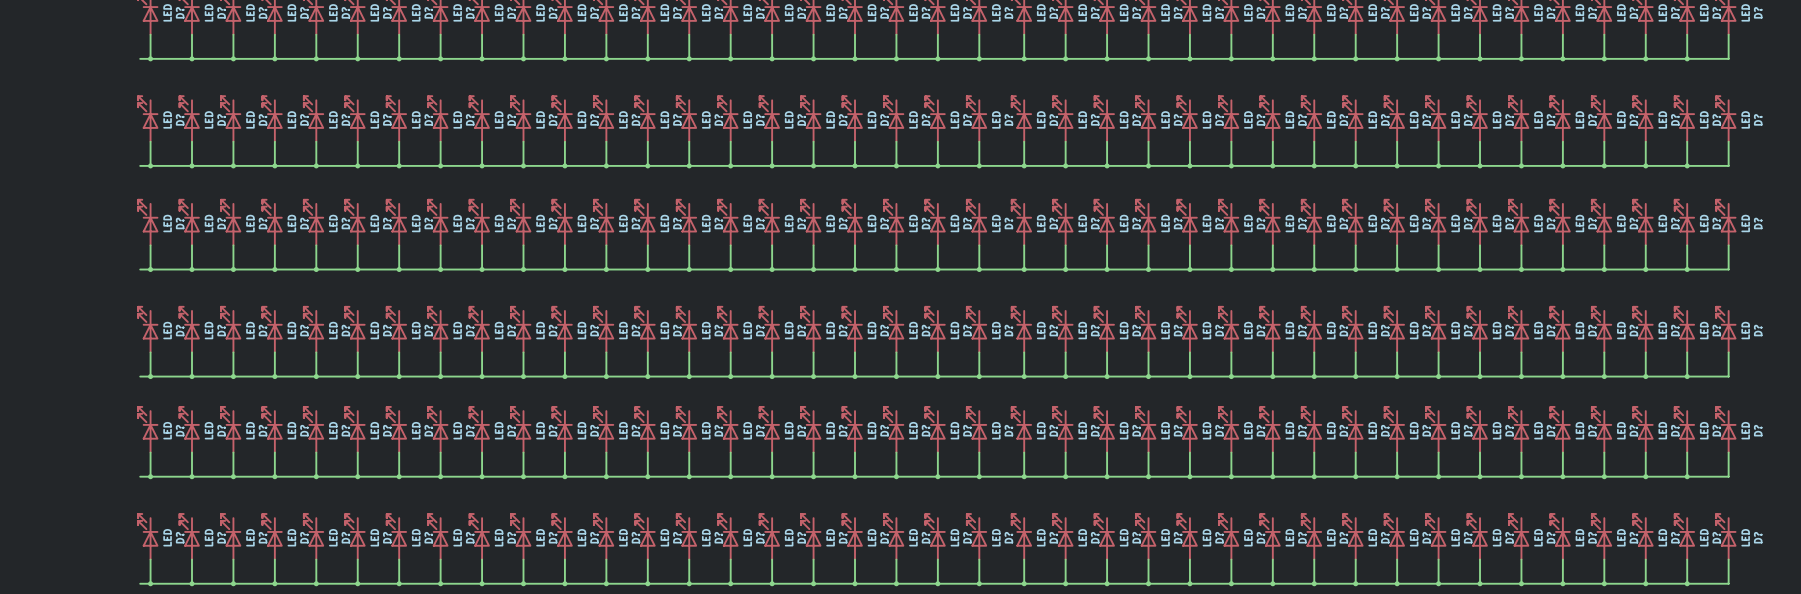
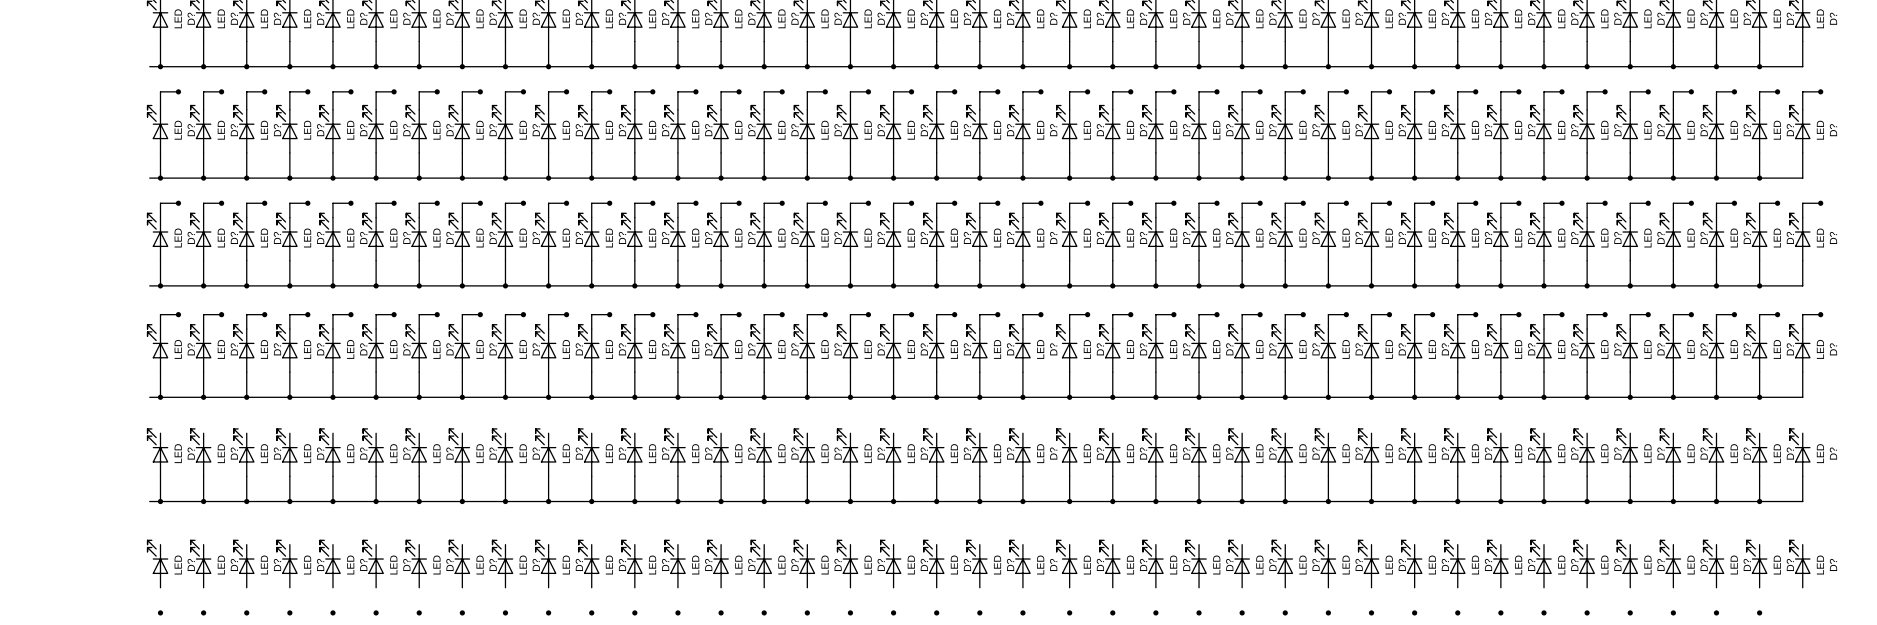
wire: none -> (178, 91) (160, 91) (160, 109)
junction: none -> (178, 91)
wire: none -> (221, 91) (203, 91) (203, 109)
junction: none -> (221, 91)
wire: none -> (264, 91) (246, 91) (246, 109)
junction: none -> (264, 91)
wire: none -> (307, 91) (289, 91) (289, 109)
junction: none -> (307, 91)
wire: none -> (350, 91) (332, 91) (332, 109)
junction: none -> (350, 91)
wire: none -> (394, 91) (376, 91) (376, 109)
junction: none -> (394, 91)
wire: none -> (437, 91) (419, 91) (419, 109)
junction: none -> (437, 91)
wire: none -> (480, 91) (462, 91) (462, 109)
junction: none -> (480, 91)
wire: none -> (523, 91) (505, 91) (505, 109)
junction: none -> (523, 91)
wire: none -> (566, 91) (548, 91) (548, 109)
junction: none -> (566, 91)
wire: none -> (609, 91) (591, 91) (591, 109)
junction: none -> (609, 91)
wire: none -> (652, 91) (634, 91) (634, 109)
junction: none -> (652, 91)
wire: none -> (695, 91) (677, 91) (677, 109)
junction: none -> (695, 91)
wire: none -> (739, 91) (721, 91) (721, 109)
junction: none -> (739, 91)
wire: none -> (782, 91) (764, 91) (764, 109)
junction: none -> (782, 91)
wire: none -> (825, 91) (807, 91) (807, 109)
junction: none -> (825, 91)
wire: none -> (868, 91) (850, 91) (850, 109)
junction: none -> (868, 91)
wire: none -> (911, 91) (893, 91) (893, 109)
junction: none -> (911, 91)
wire: none -> (954, 91) (936, 91) (936, 109)
junction: none -> (954, 91)
wire: none -> (997, 91) (979, 91) (979, 109)
junction: none -> (997, 91)
wire: none -> (1040, 91) (1022, 91) (1022, 109)
junction: none -> (1040, 91)
wire: none -> (1087, 91) (1069, 91) (1069, 109)
junction: none -> (1087, 91)
wire: none -> (1130, 91) (1112, 91) (1112, 109)
junction: none -> (1130, 91)
wire: none -> (1173, 91) (1155, 91) (1155, 109)
junction: none -> (1173, 91)
wire: none -> (1216, 91) (1199, 91) (1199, 109)
junction: none -> (1216, 91)
wire: none -> (1260, 91) (1242, 91) (1242, 109)
junction: none -> (1260, 91)
wire: none -> (1303, 91) (1285, 91) (1285, 109)
junction: none -> (1303, 91)
wire: none -> (1346, 91) (1328, 91) (1328, 109)
junction: none -> (1346, 91)
wire: none -> (1389, 91) (1371, 91) (1371, 109)
junction: none -> (1389, 91)
wire: none -> (1432, 91) (1414, 91) (1414, 109)
junction: none -> (1432, 91)
wire: none -> (1475, 91) (1457, 91) (1457, 109)
junction: none -> (1475, 91)
wire: none -> (1518, 91) (1500, 91) (1500, 109)
junction: none -> (1518, 91)
wire: none -> (1561, 91) (1544, 91) (1544, 109)
junction: none -> (1561, 91)
wire: none -> (1605, 91) (1587, 91) (1587, 109)
junction: none -> (1605, 91)
wire: none -> (1648, 91) (1630, 91) (1630, 109)
junction: none -> (1648, 91)
wire: none -> (1691, 91) (1673, 91) (1673, 109)
junction: none -> (1691, 91)
wire: none -> (1734, 91) (1716, 91) (1716, 109)
junction: none -> (1734, 91)
wire: none -> (1777, 91) (1759, 91) (1759, 109)
junction: none -> (1777, 91)
wire: none -> (1820, 91) (1802, 91) (1802, 109)
junction: none -> (1820, 91)
wire: none -> (178, 203) (160, 203) (160, 217)
junction: none -> (178, 203)
wire: none -> (221, 203) (203, 203) (203, 217)
junction: none -> (221, 203)
wire: none -> (264, 203) (246, 203) (246, 217)
junction: none -> (264, 203)
wire: none -> (307, 203) (289, 203) (289, 217)
junction: none -> (307, 203)
wire: none -> (350, 203) (332, 203) (332, 217)
junction: none -> (350, 203)
wire: none -> (394, 203) (376, 203) (376, 217)
junction: none -> (394, 203)
wire: none -> (437, 203) (419, 203) (419, 217)
junction: none -> (437, 203)
wire: none -> (480, 203) (462, 203) (462, 217)
junction: none -> (480, 203)
wire: none -> (523, 203) (505, 203) (505, 217)
junction: none -> (523, 203)
wire: none -> (566, 203) (548, 203) (548, 217)
junction: none -> (566, 203)
wire: none -> (609, 203) (591, 203) (591, 217)
junction: none -> (609, 203)
wire: none -> (652, 203) (634, 203) (634, 217)
junction: none -> (652, 203)
wire: none -> (695, 203) (677, 203) (677, 217)
junction: none -> (695, 203)
wire: none -> (739, 203) (721, 203) (721, 217)
junction: none -> (739, 203)
wire: none -> (782, 203) (764, 203) (764, 217)
junction: none -> (782, 203)
wire: none -> (825, 203) (807, 203) (807, 217)
junction: none -> (825, 203)
wire: none -> (868, 203) (850, 203) (850, 217)
junction: none -> (868, 203)
wire: none -> (911, 203) (893, 203) (893, 217)
junction: none -> (911, 203)
wire: none -> (954, 203) (936, 203) (936, 217)
junction: none -> (954, 203)
wire: none -> (997, 203) (979, 203) (979, 217)
junction: none -> (997, 203)
wire: none -> (1040, 203) (1022, 203) (1022, 217)
junction: none -> (1040, 203)
wire: none -> (1087, 203) (1069, 203) (1069, 217)
junction: none -> (1087, 203)
wire: none -> (1130, 203) (1112, 203) (1112, 217)
junction: none -> (1130, 203)
wire: none -> (1173, 203) (1155, 203) (1155, 217)
junction: none -> (1173, 203)
wire: none -> (1216, 203) (1199, 203) (1199, 217)
junction: none -> (1216, 203)
wire: none -> (1260, 203) (1242, 203) (1242, 217)
junction: none -> (1260, 203)
wire: none -> (1303, 203) (1285, 203) (1285, 217)
junction: none -> (1303, 203)
wire: none -> (1346, 203) (1328, 203) (1328, 217)
junction: none -> (1346, 203)
wire: none -> (1389, 203) (1371, 203) (1371, 217)
junction: none -> (1389, 203)
wire: none -> (1432, 203) (1414, 203) (1414, 217)
junction: none -> (1432, 203)
wire: none -> (1475, 203) (1457, 203) (1457, 217)
junction: none -> (1475, 203)
wire: none -> (1518, 203) (1500, 203) (1500, 217)
junction: none -> (1518, 203)
wire: none -> (1561, 203) (1544, 203) (1544, 217)
junction: none -> (1561, 203)
wire: none -> (1605, 203) (1587, 203) (1587, 217)
junction: none -> (1605, 203)
wire: none -> (1648, 203) (1630, 203) (1630, 217)
junction: none -> (1648, 203)
wire: none -> (1691, 203) (1673, 203) (1673, 217)
junction: none -> (1691, 203)
wire: none -> (1734, 203) (1716, 203) (1716, 217)
junction: none -> (1734, 203)
wire: none -> (1777, 203) (1759, 203) (1759, 217)
junction: none -> (1777, 203)
wire: none -> (1820, 203) (1802, 203) (1802, 217)
junction: none -> (1820, 203)
wire: none -> (178, 314) (160, 314) (160, 329)
junction: none -> (178, 314)
wire: none -> (221, 314) (203, 314) (203, 329)
junction: none -> (221, 314)
wire: none -> (264, 314) (246, 314) (246, 329)
junction: none -> (264, 314)
wire: none -> (307, 314) (289, 314) (289, 329)
junction: none -> (307, 314)
wire: none -> (350, 314) (332, 314) (332, 329)
junction: none -> (350, 314)
wire: none -> (394, 314) (376, 314) (376, 329)
junction: none -> (394, 314)
wire: none -> (437, 314) (419, 314) (419, 329)
junction: none -> (437, 314)
wire: none -> (480, 314) (462, 314) (462, 329)
junction: none -> (480, 314)
wire: none -> (523, 314) (505, 314) (505, 329)
junction: none -> (523, 314)
wire: none -> (566, 314) (548, 314) (548, 329)
junction: none -> (566, 314)
wire: none -> (609, 314) (591, 314) (591, 329)
junction: none -> (609, 314)
wire: none -> (652, 314) (634, 314) (634, 329)
junction: none -> (652, 314)
wire: none -> (695, 314) (677, 314) (677, 329)
junction: none -> (695, 314)
wire: none -> (739, 314) (721, 314) (721, 329)
junction: none -> (739, 314)
wire: none -> (782, 314) (764, 314) (764, 329)
junction: none -> (782, 314)
wire: none -> (825, 314) (807, 314) (807, 329)
junction: none -> (825, 314)
wire: none -> (868, 314) (850, 314) (850, 329)
junction: none -> (868, 314)
wire: none -> (911, 314) (893, 314) (893, 329)
junction: none -> (911, 314)
wire: none -> (954, 314) (936, 314) (936, 329)
junction: none -> (954, 314)
wire: none -> (997, 314) (979, 314) (979, 329)
junction: none -> (997, 314)
wire: none -> (1040, 314) (1022, 314) (1022, 329)
junction: none -> (1040, 314)
wire: none -> (1087, 314) (1069, 314) (1069, 329)
junction: none -> (1087, 314)
wire: none -> (1130, 314) (1112, 314) (1112, 329)
junction: none -> (1130, 314)
wire: none -> (1173, 314) (1155, 314) (1155, 329)
junction: none -> (1173, 314)
wire: none -> (1216, 314) (1199, 314) (1199, 329)
junction: none -> (1216, 314)
wire: none -> (1260, 314) (1242, 314) (1242, 329)
junction: none -> (1260, 314)
wire: none -> (1303, 314) (1285, 314) (1285, 329)
junction: none -> (1303, 314)
wire: none -> (1346, 314) (1328, 314) (1328, 329)
junction: none -> (1346, 314)
wire: none -> (1389, 314) (1371, 314) (1371, 329)
junction: none -> (1389, 314)
wire: none -> (1432, 314) (1414, 314) (1414, 329)
junction: none -> (1432, 314)
wire: none -> (1475, 314) (1457, 314) (1457, 329)
junction: none -> (1475, 314)
wire: none -> (1518, 314) (1500, 314) (1500, 329)
junction: none -> (1518, 314)
wire: none -> (1561, 314) (1544, 314) (1544, 329)
junction: none -> (1561, 314)
wire: none -> (1605, 314) (1587, 314) (1587, 329)
junction: none -> (1605, 314)
wire: none -> (1648, 314) (1630, 314) (1630, 329)
junction: none -> (1648, 314)
wire: none -> (1691, 314) (1673, 314) (1673, 329)
junction: none -> (1691, 314)
wire: none -> (1734, 314) (1716, 314) (1716, 329)
junction: none -> (1734, 314)
wire: none -> (1777, 314) (1759, 314) (1759, 329)
junction: none -> (1777, 314)
wire: none -> (1820, 314) (1802, 314) (1802, 329)
junction: none -> (1820, 314)
wire: (150, 559) (150, 583) -> none
wire: (192, 559) (192, 583) -> none
wire: (233, 559) (233, 583) -> none
wire: (274, 559) (274, 583) -> none
wire: (316, 559) (316, 583) -> none
wire: (357, 559) (357, 583) -> none
wire: (399, 559) (399, 583) -> none
wire: (440, 559) (440, 583) -> none
wire: (482, 559) (482, 583) -> none
wire: (523, 559) (523, 583) -> none
wire: (564, 559) (564, 583) -> none
wire: (606, 559) (606, 583) -> none
wire: (647, 559) (647, 583) -> none
wire: (689, 559) (689, 583) -> none
wire: (730, 559) (730, 583) -> none
wire: (772, 559) (772, 583) -> none
wire: (813, 559) (813, 583) -> none
wire: (855, 559) (855, 583) -> none
wire: (896, 559) (896, 583) -> none
wire: (937, 559) (937, 583) -> none
wire: (979, 559) (979, 583) -> none
wire: (1024, 559) (1024, 583) -> none
wire: (1065, 559) (1065, 583) -> none
wire: (1107, 559) (1107, 583) -> none
wire: (1148, 559) (1148, 583) -> none
wire: (1189, 559) (1189, 583) -> none
wire: (1231, 559) (1231, 583) -> none
wire: (1272, 559) (1272, 583) -> none
wire: (1314, 559) (1314, 583) -> none
wire: (1355, 559) (1355, 583) -> none
wire: (1397, 559) (1397, 583) -> none
wire: (1438, 559) (1438, 583) -> none
wire: (1480, 559) (1480, 583) -> none
wire: (1521, 559) (1521, 583) -> none
wire: (1562, 559) (1562, 583) -> none
wire: (1604, 559) (1604, 583) -> none
wire: (1645, 559) (1645, 583) -> none
wire: (1687, 559) (1687, 583) -> none
wire: (1728, 559) (1728, 583) (140, 583) -> none

